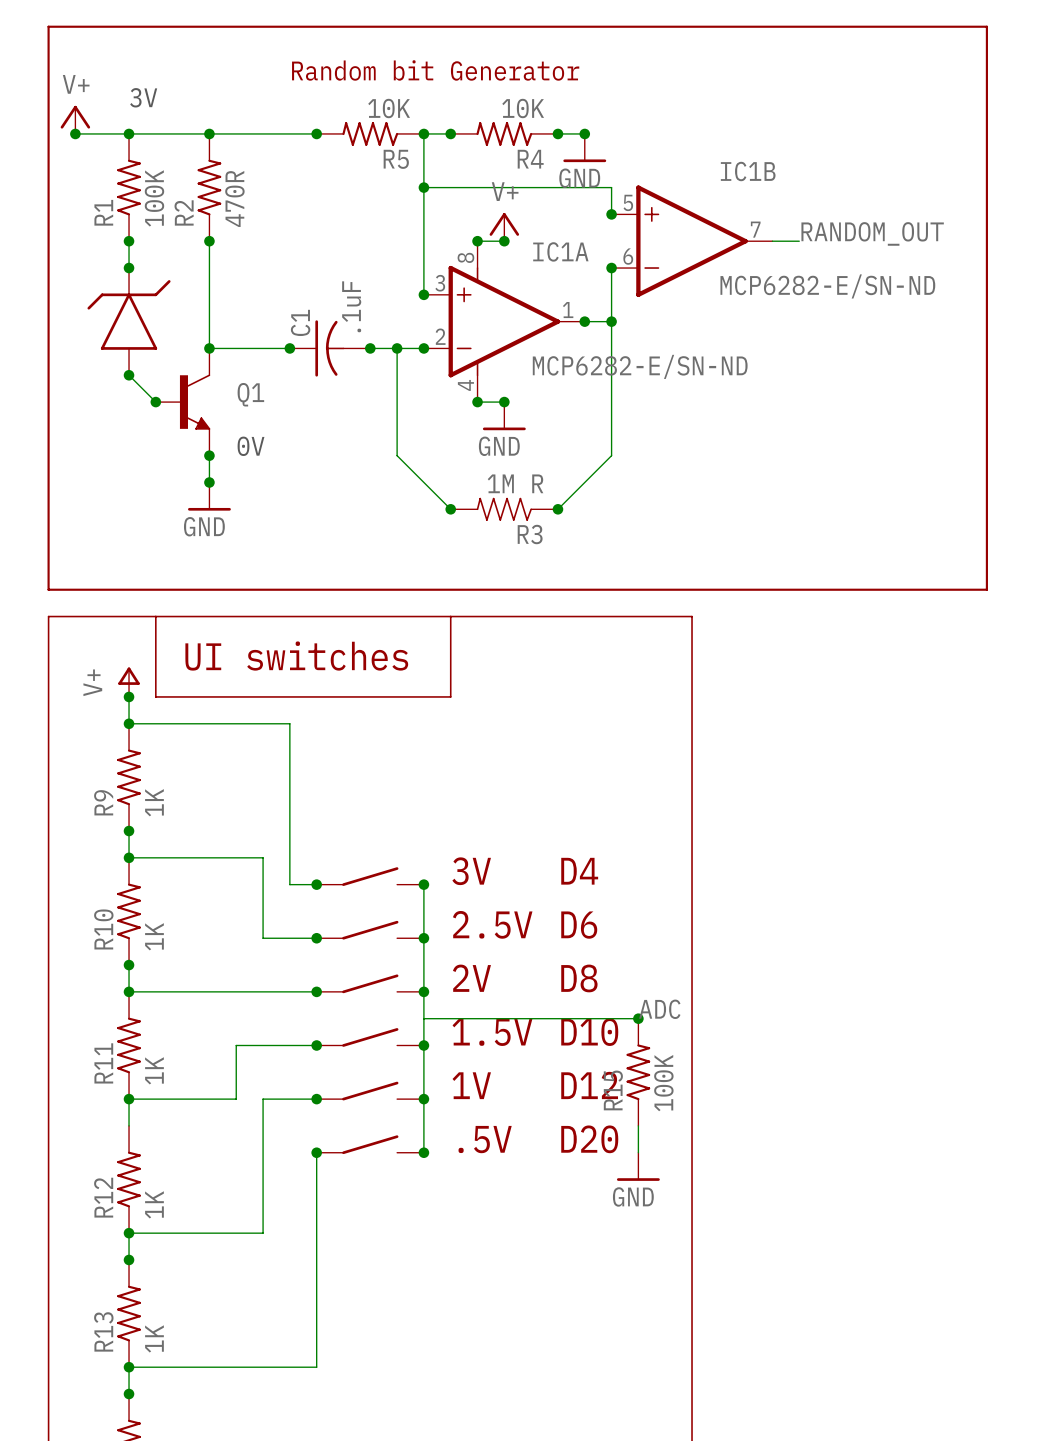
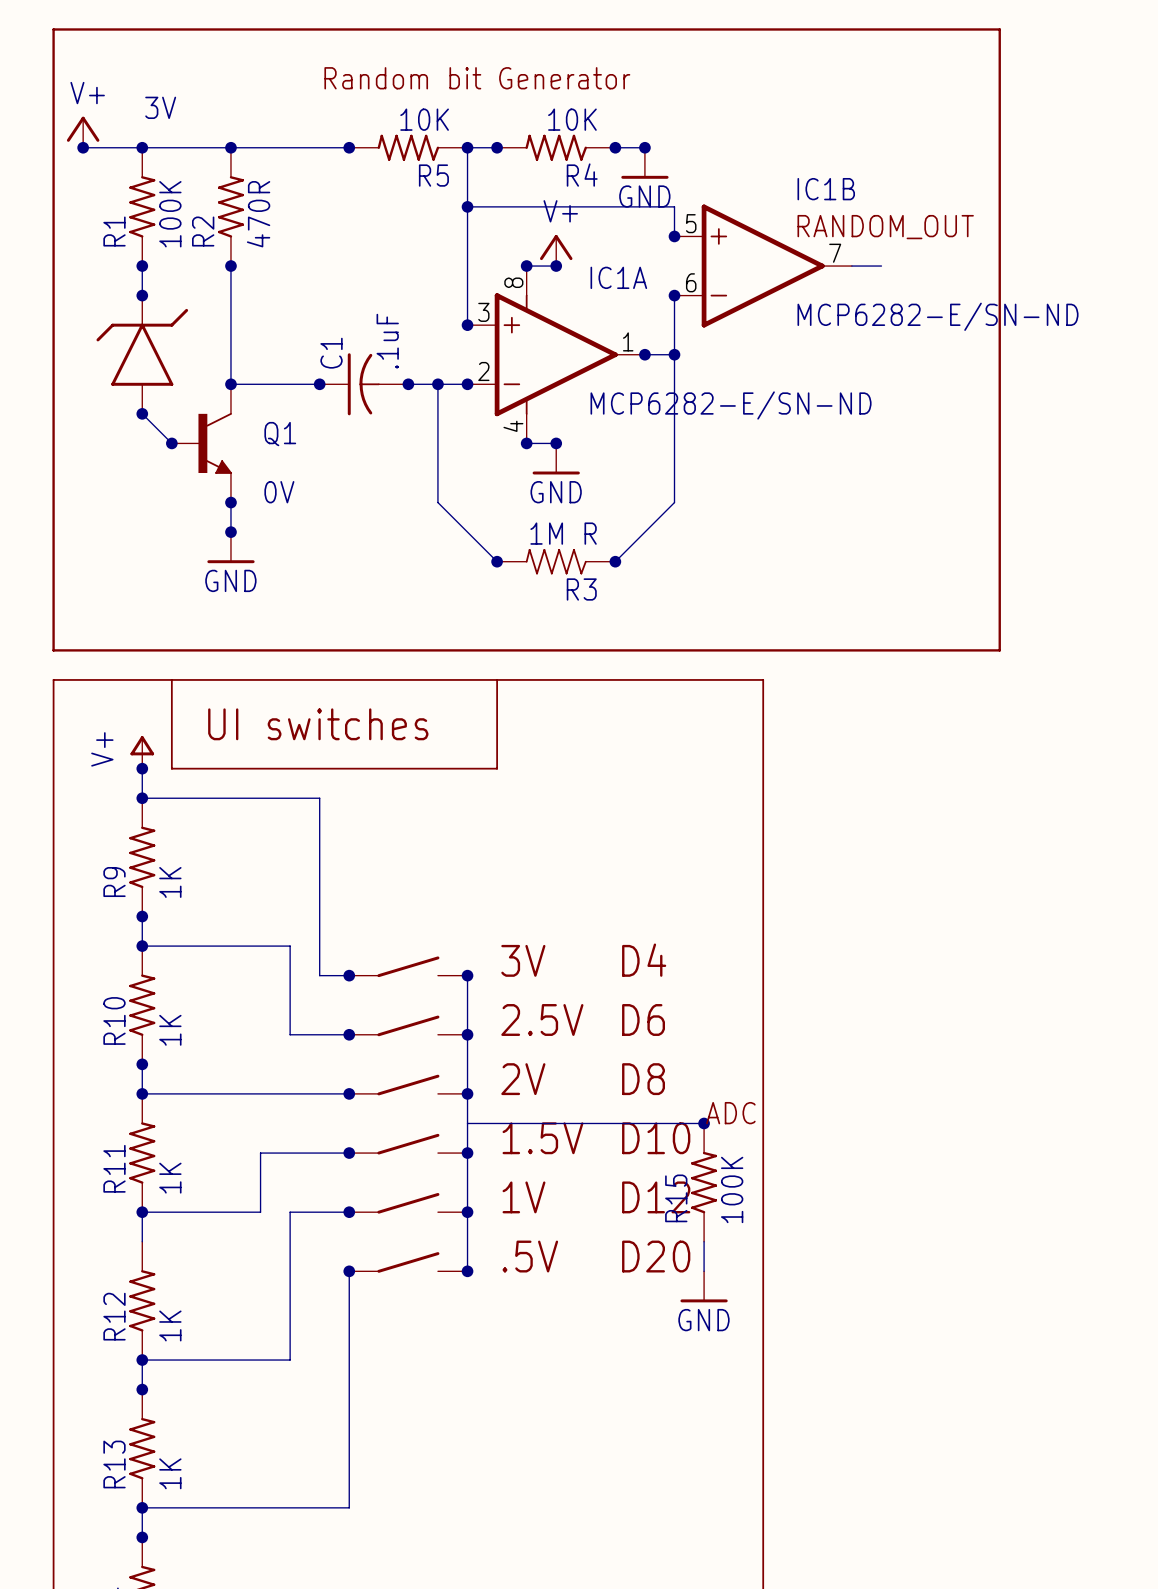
line: (906, 26) (986, 26) (986, 589) (906, 589) -> (999, 29) (999, 650)
label position: RANDOM_OUT (872, 233) -> RANDOM_OUT (885, 227)

